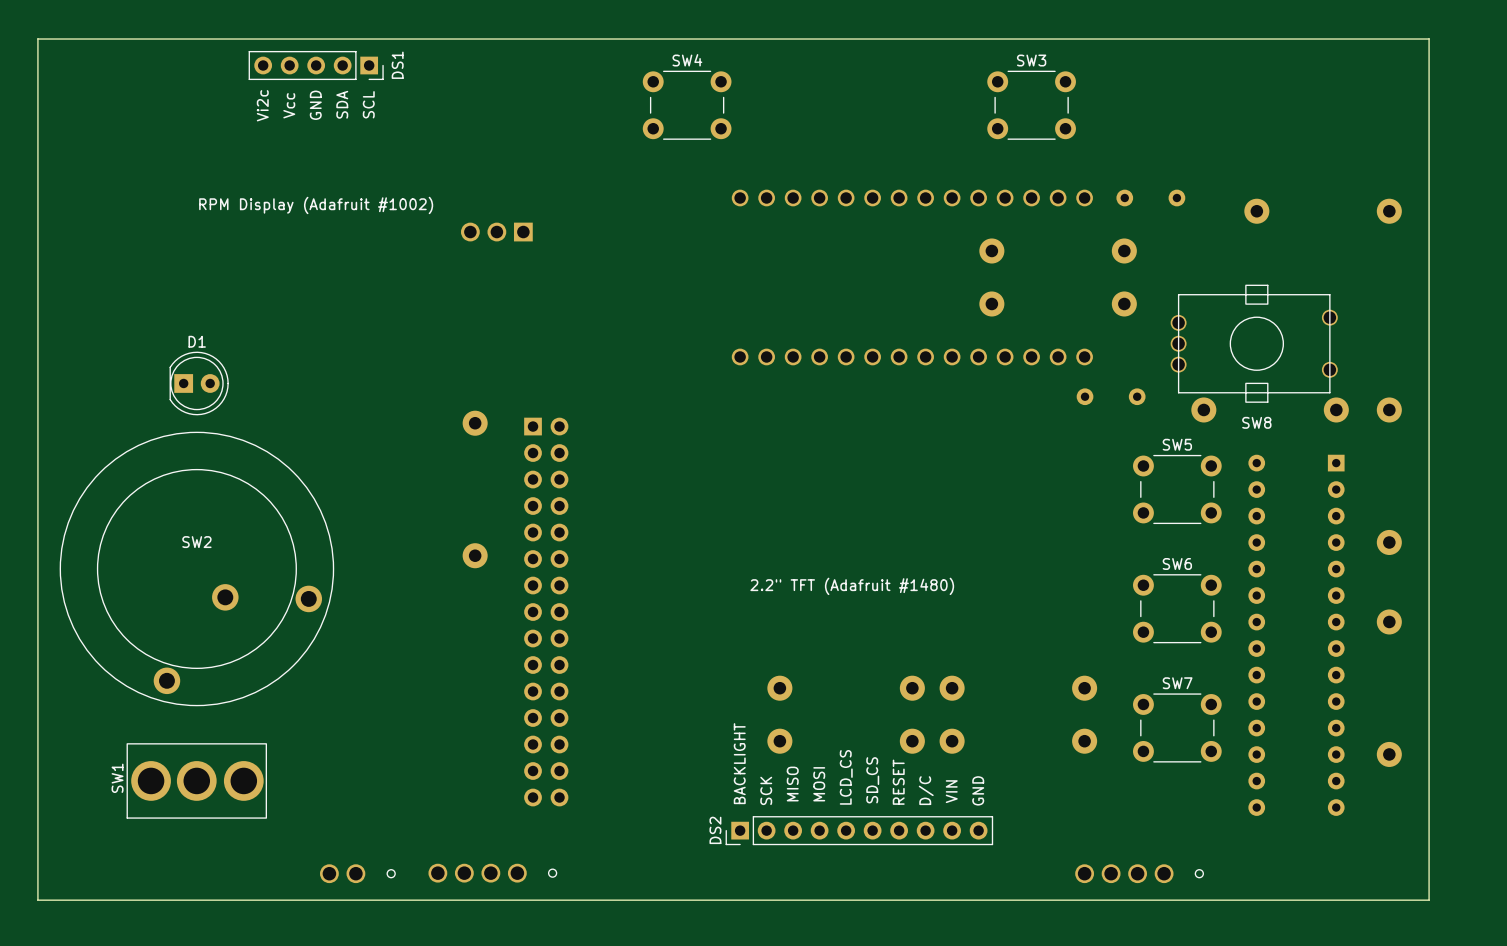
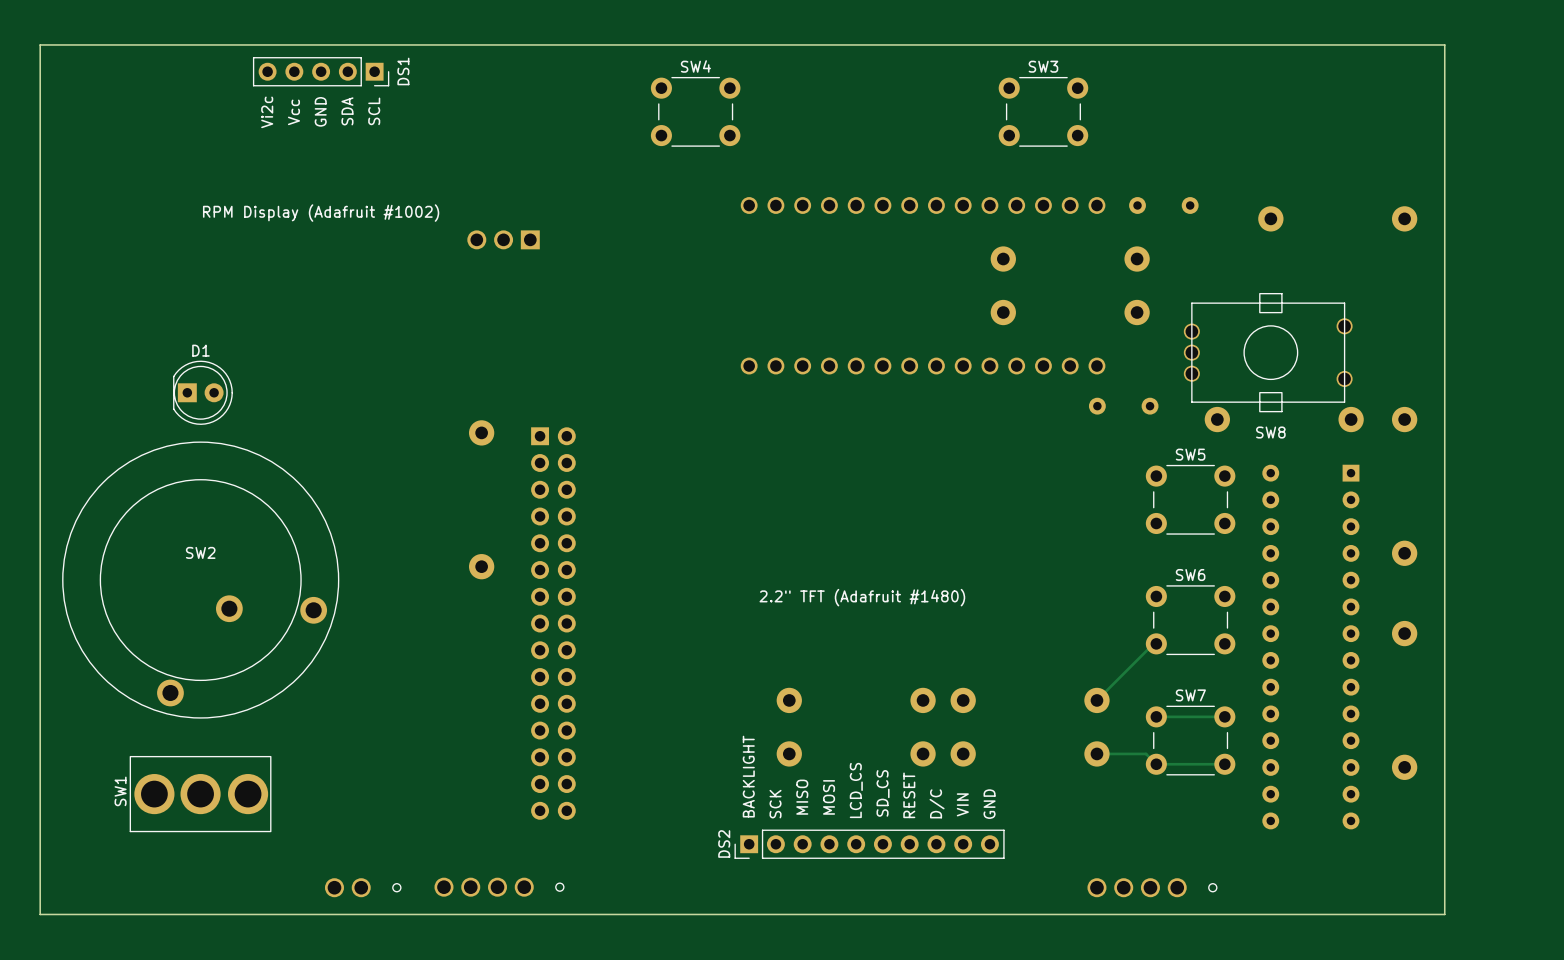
track: none -> (1156, 643) (1153, 643) (1096, 700)
track: none -> (1156, 716) (1224, 716)
track: none -> (1096, 753) (1146, 753) (1156, 764) (1224, 764)

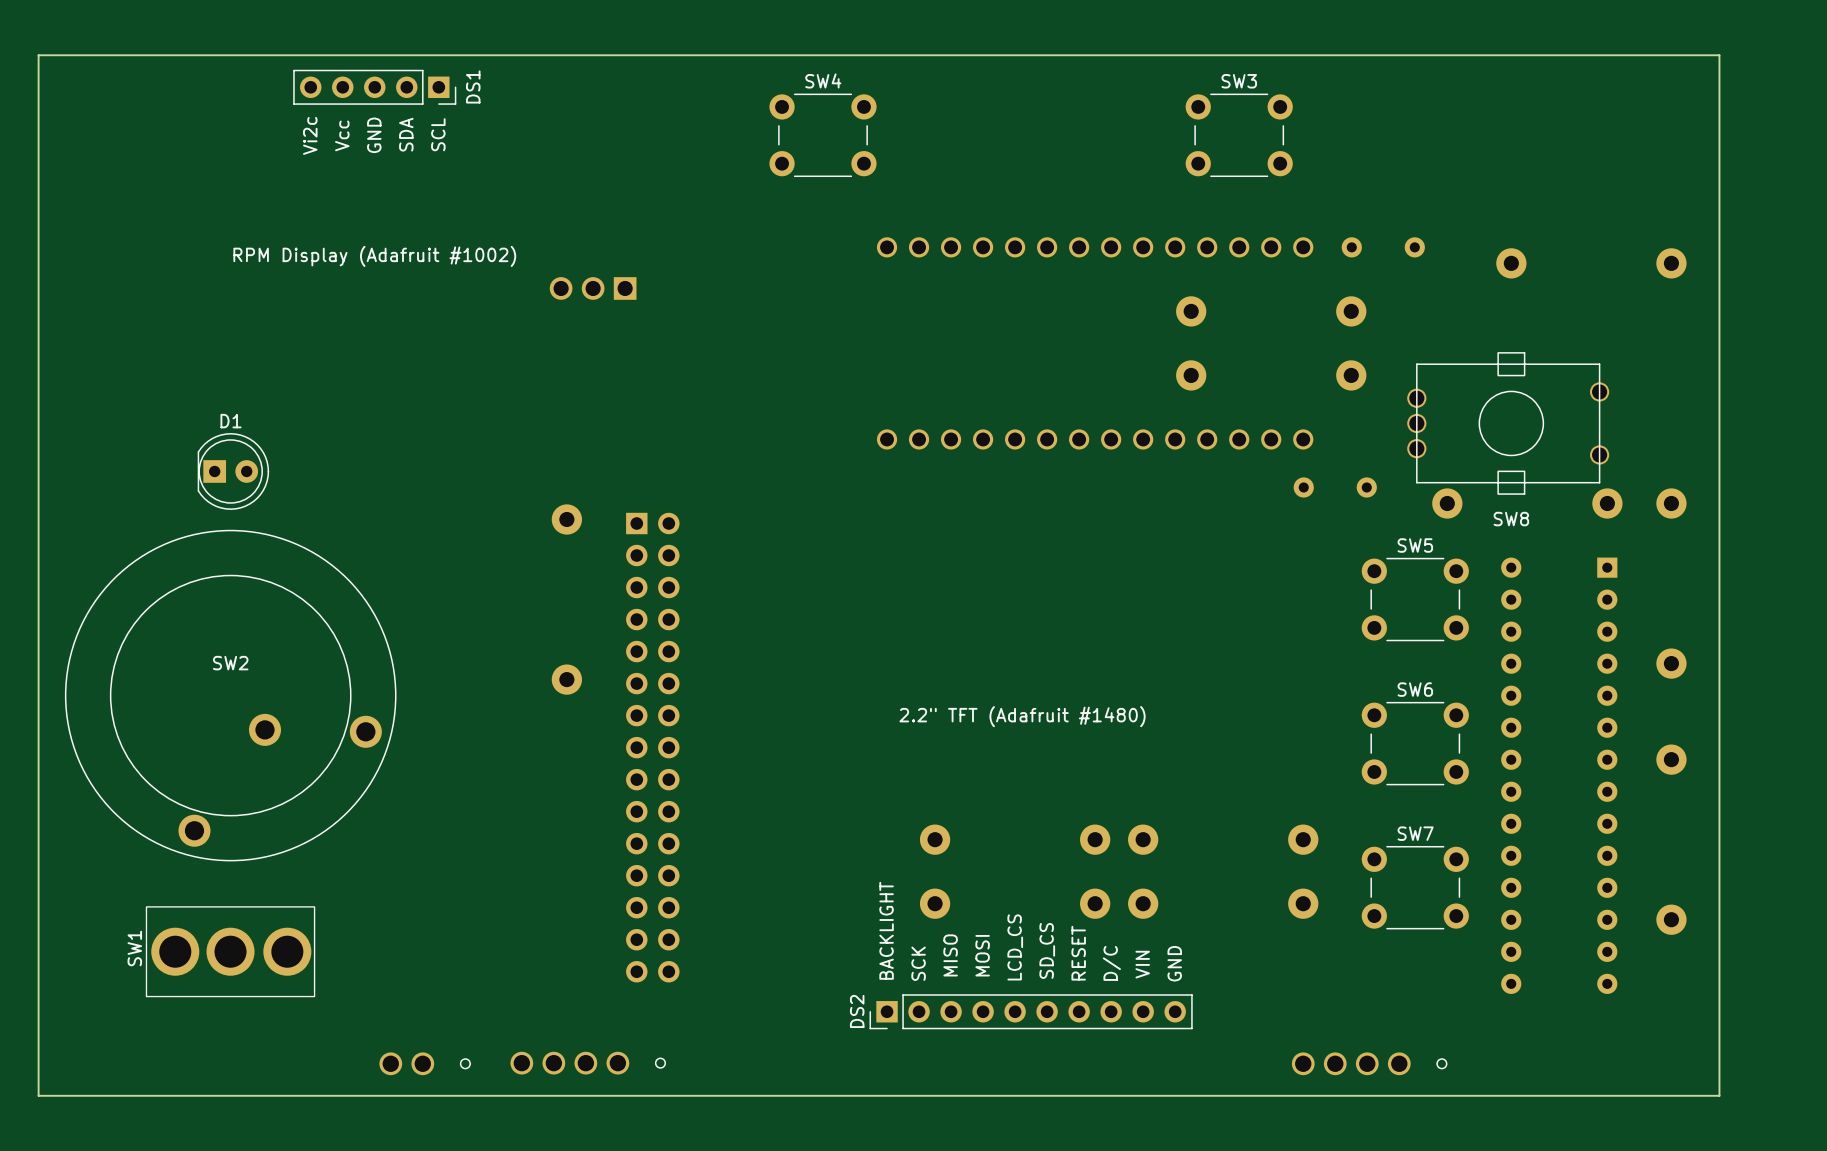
track: (1156, 643) (1153, 643) (1096, 700) -> none
track: (1156, 716) (1224, 716) -> none
track: (1096, 753) (1146, 753) (1156, 764) (1224, 764) -> none

